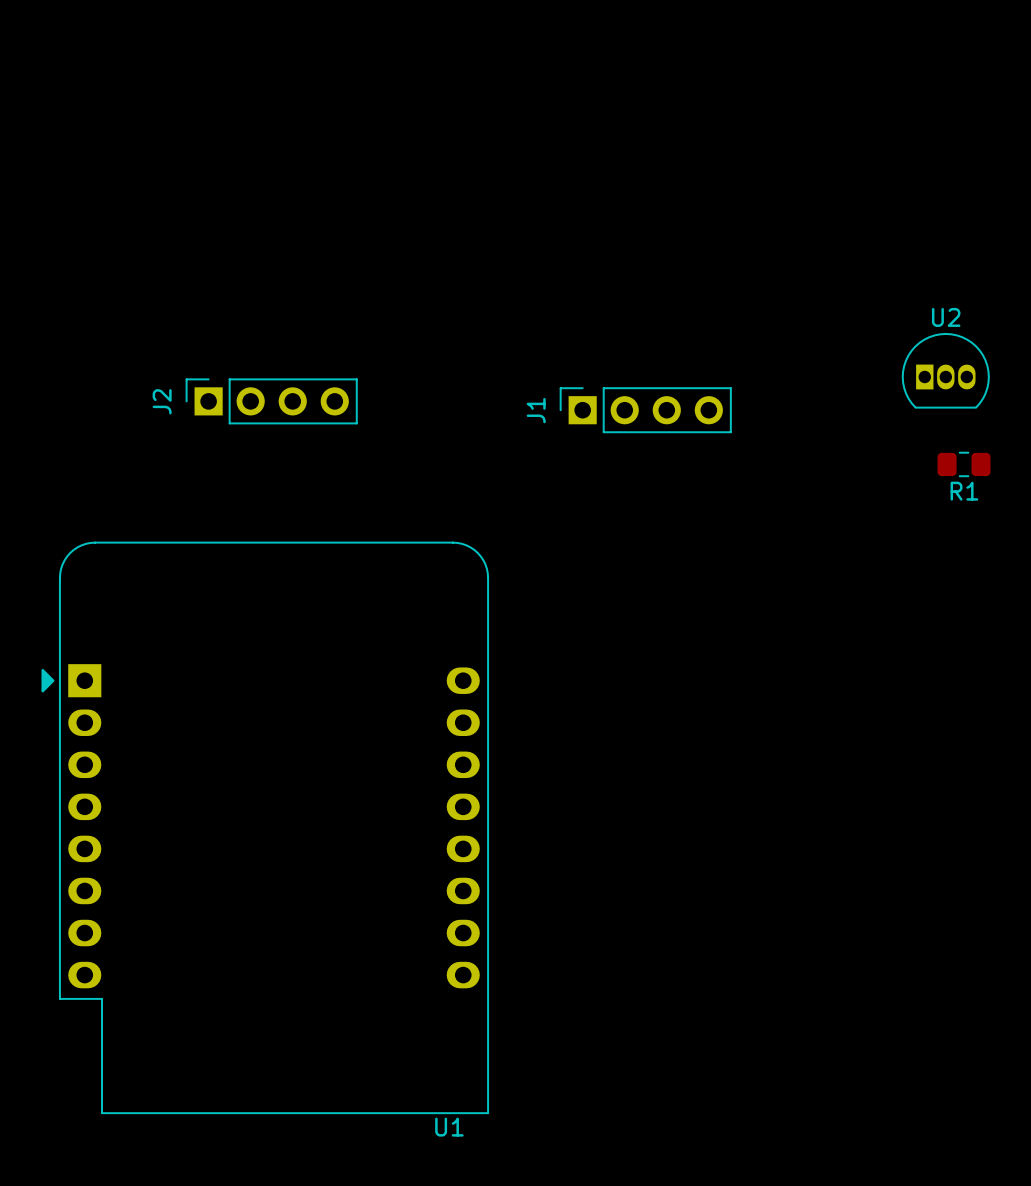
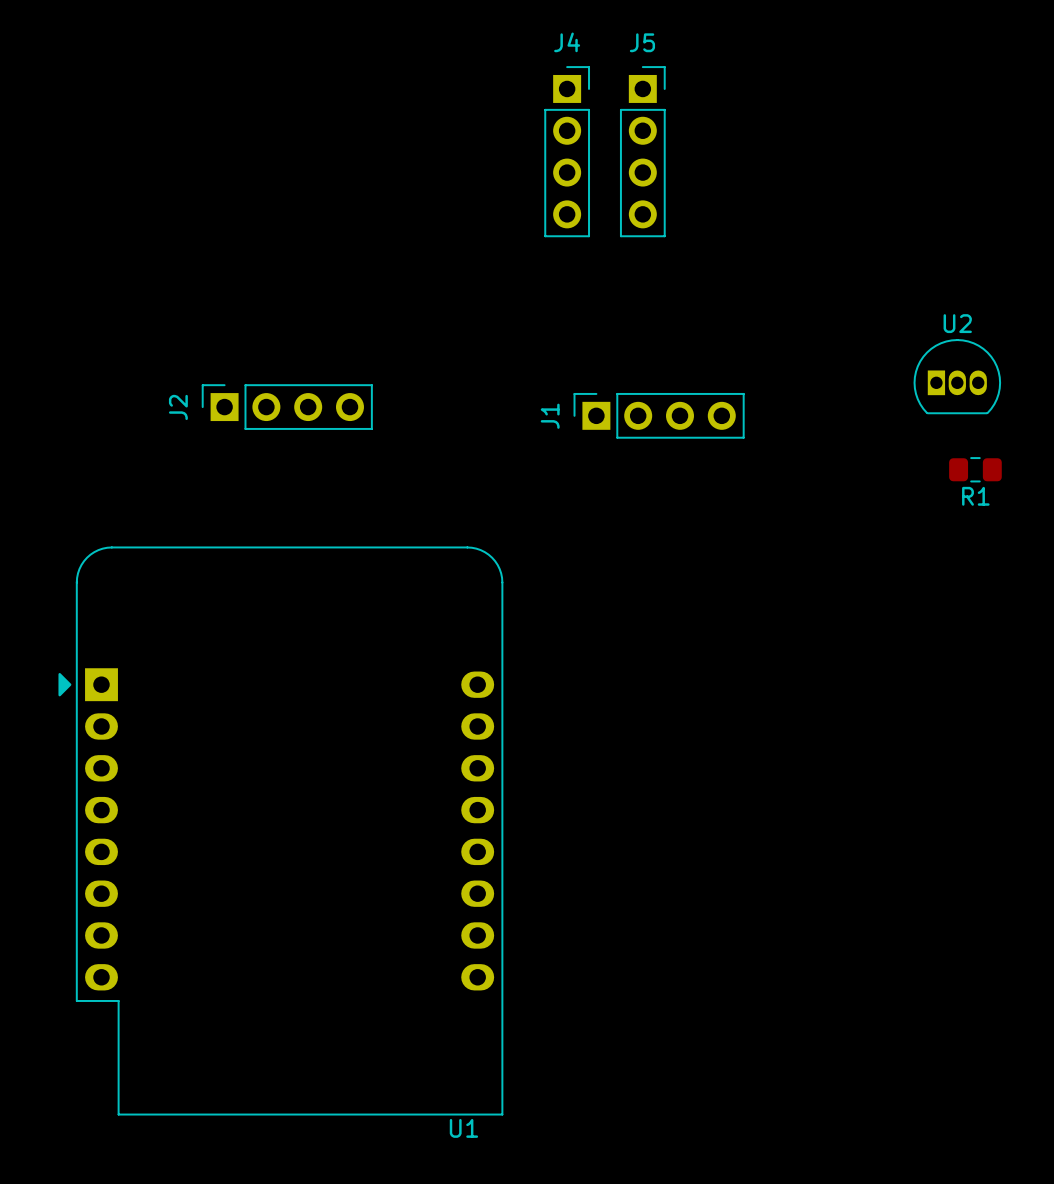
J4: none -> (567, 151)
J5: none -> (642, 151)

